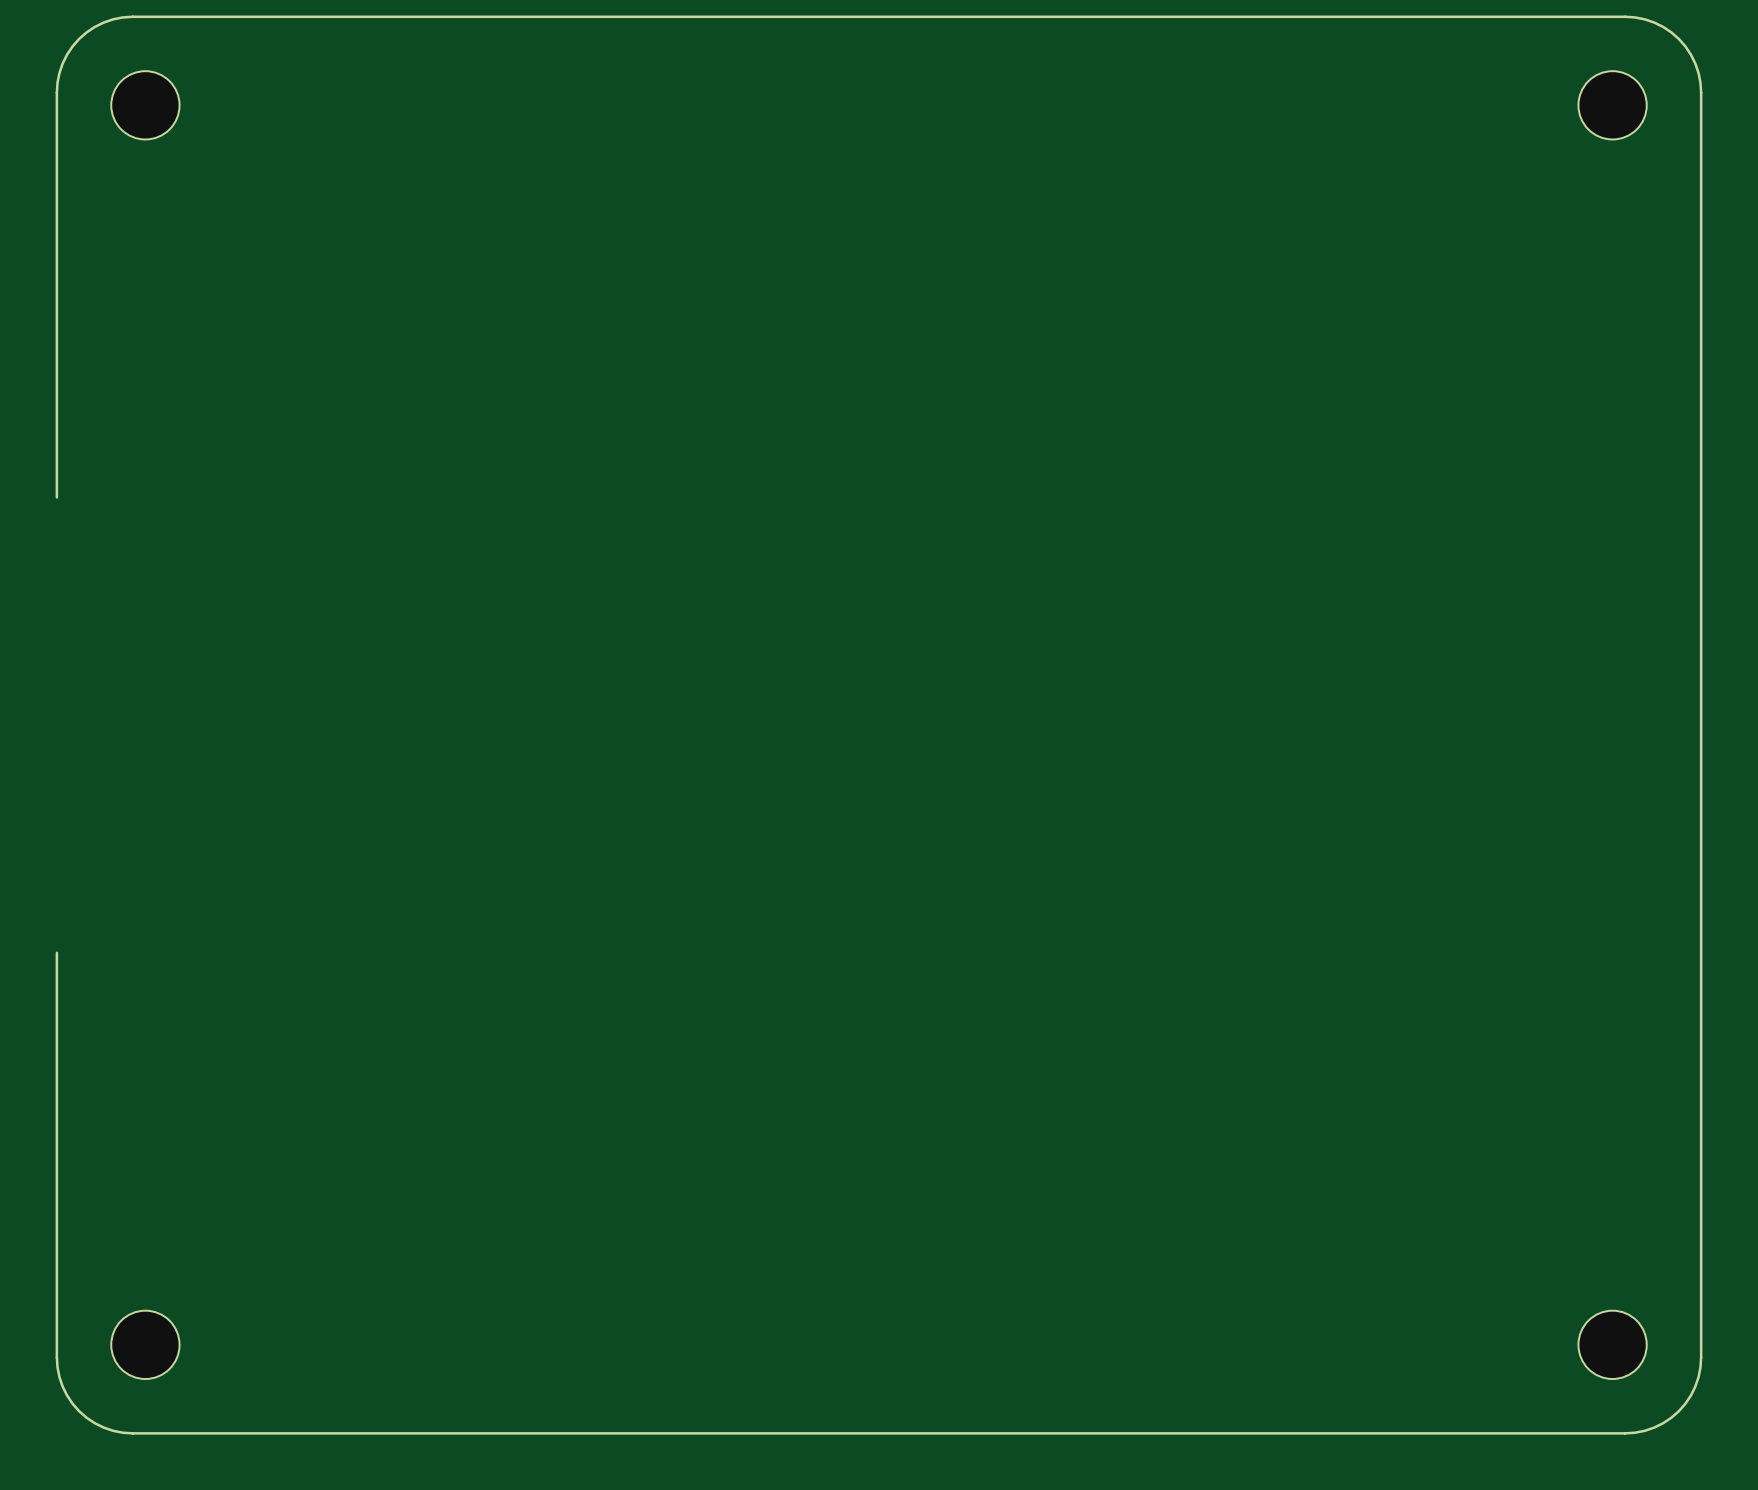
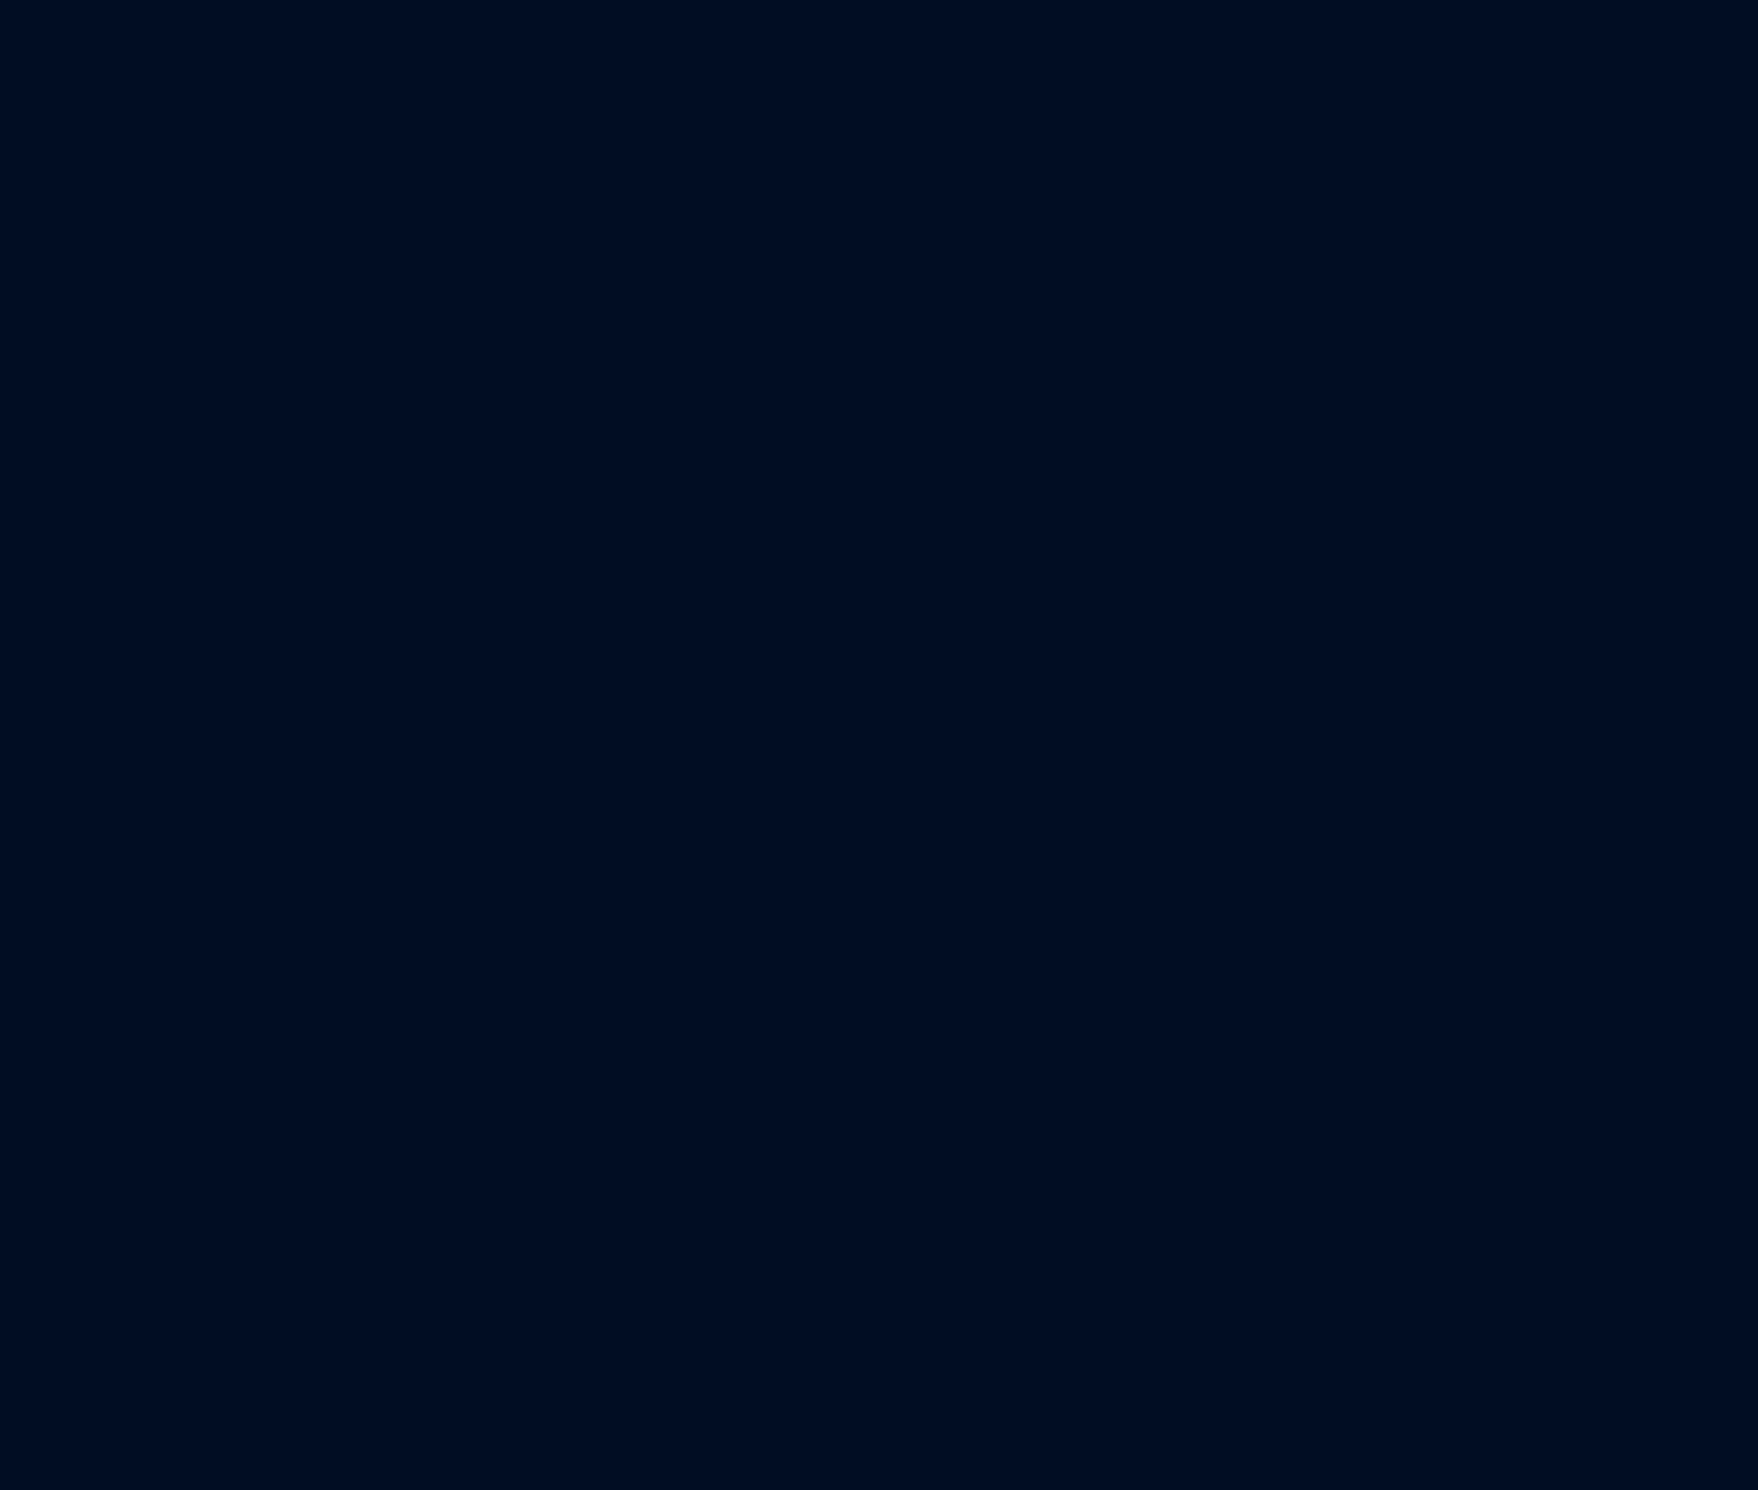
part: (145, 105) -> none
part: (1612, 105) -> none
board edge: (56, 497) (57, 82) (62, 63) (72, 46) (86, 32) (113, 19) (132, 16) (1625, 16) (1644, 19) (1671, 32) (1685, 46) (1698, 73) (1701, 92) (1701, 1357) (1698, 1377) (1690, 1395) (1678, 1411) (1663, 1423) (1644, 1430) (1625, 1433) (132, 1433) (113, 1430) (86, 1417) (72, 1403) (62, 1386) (57, 1367) (56, 952) -> none
part: (145, 1344) -> none
part: (1612, 1344) -> none

